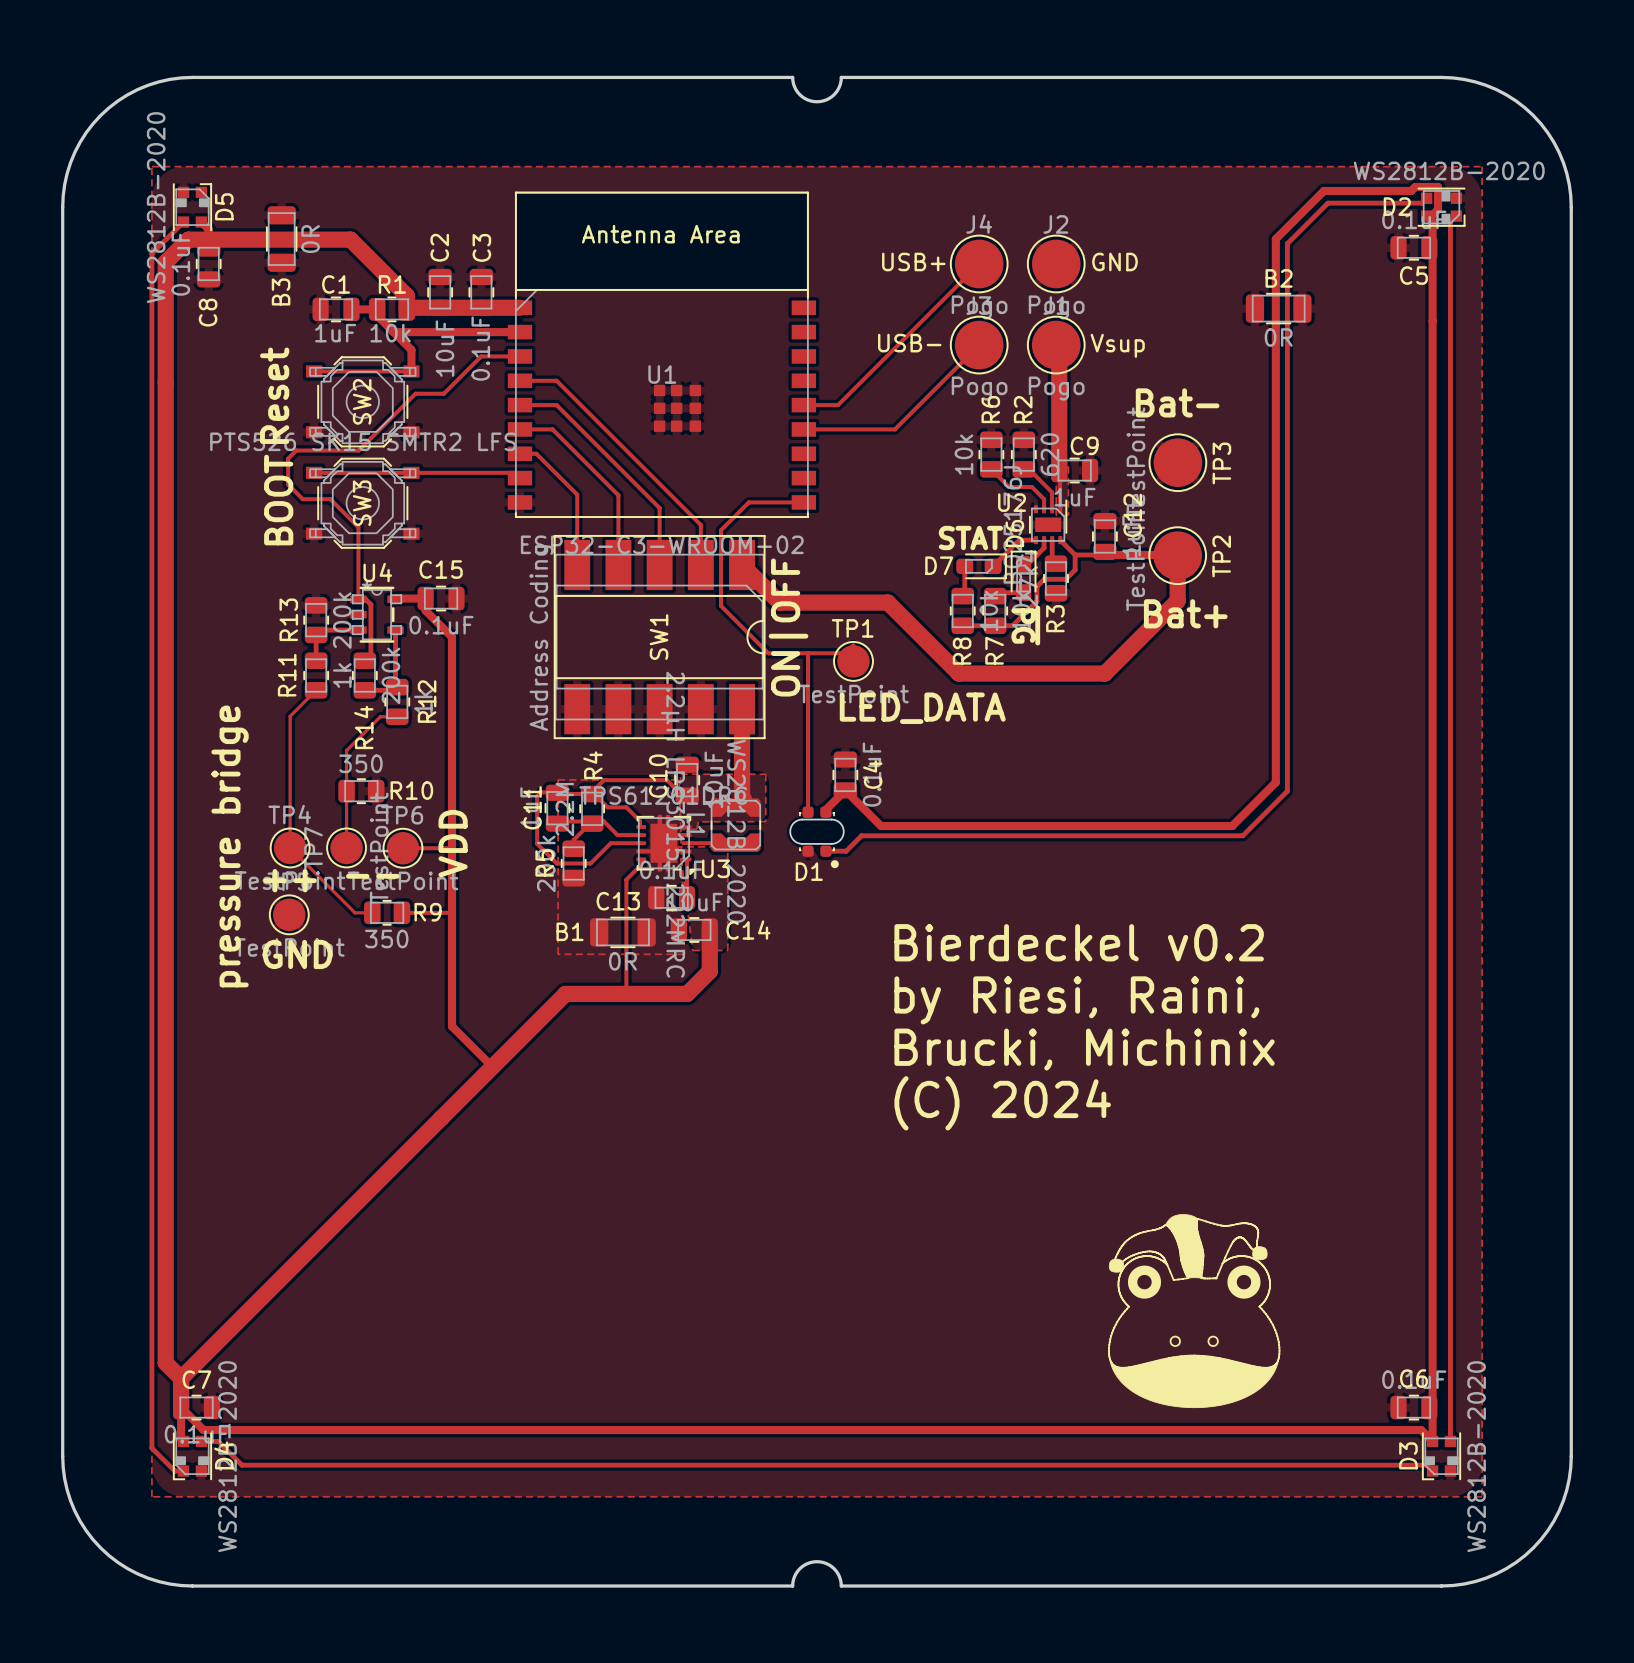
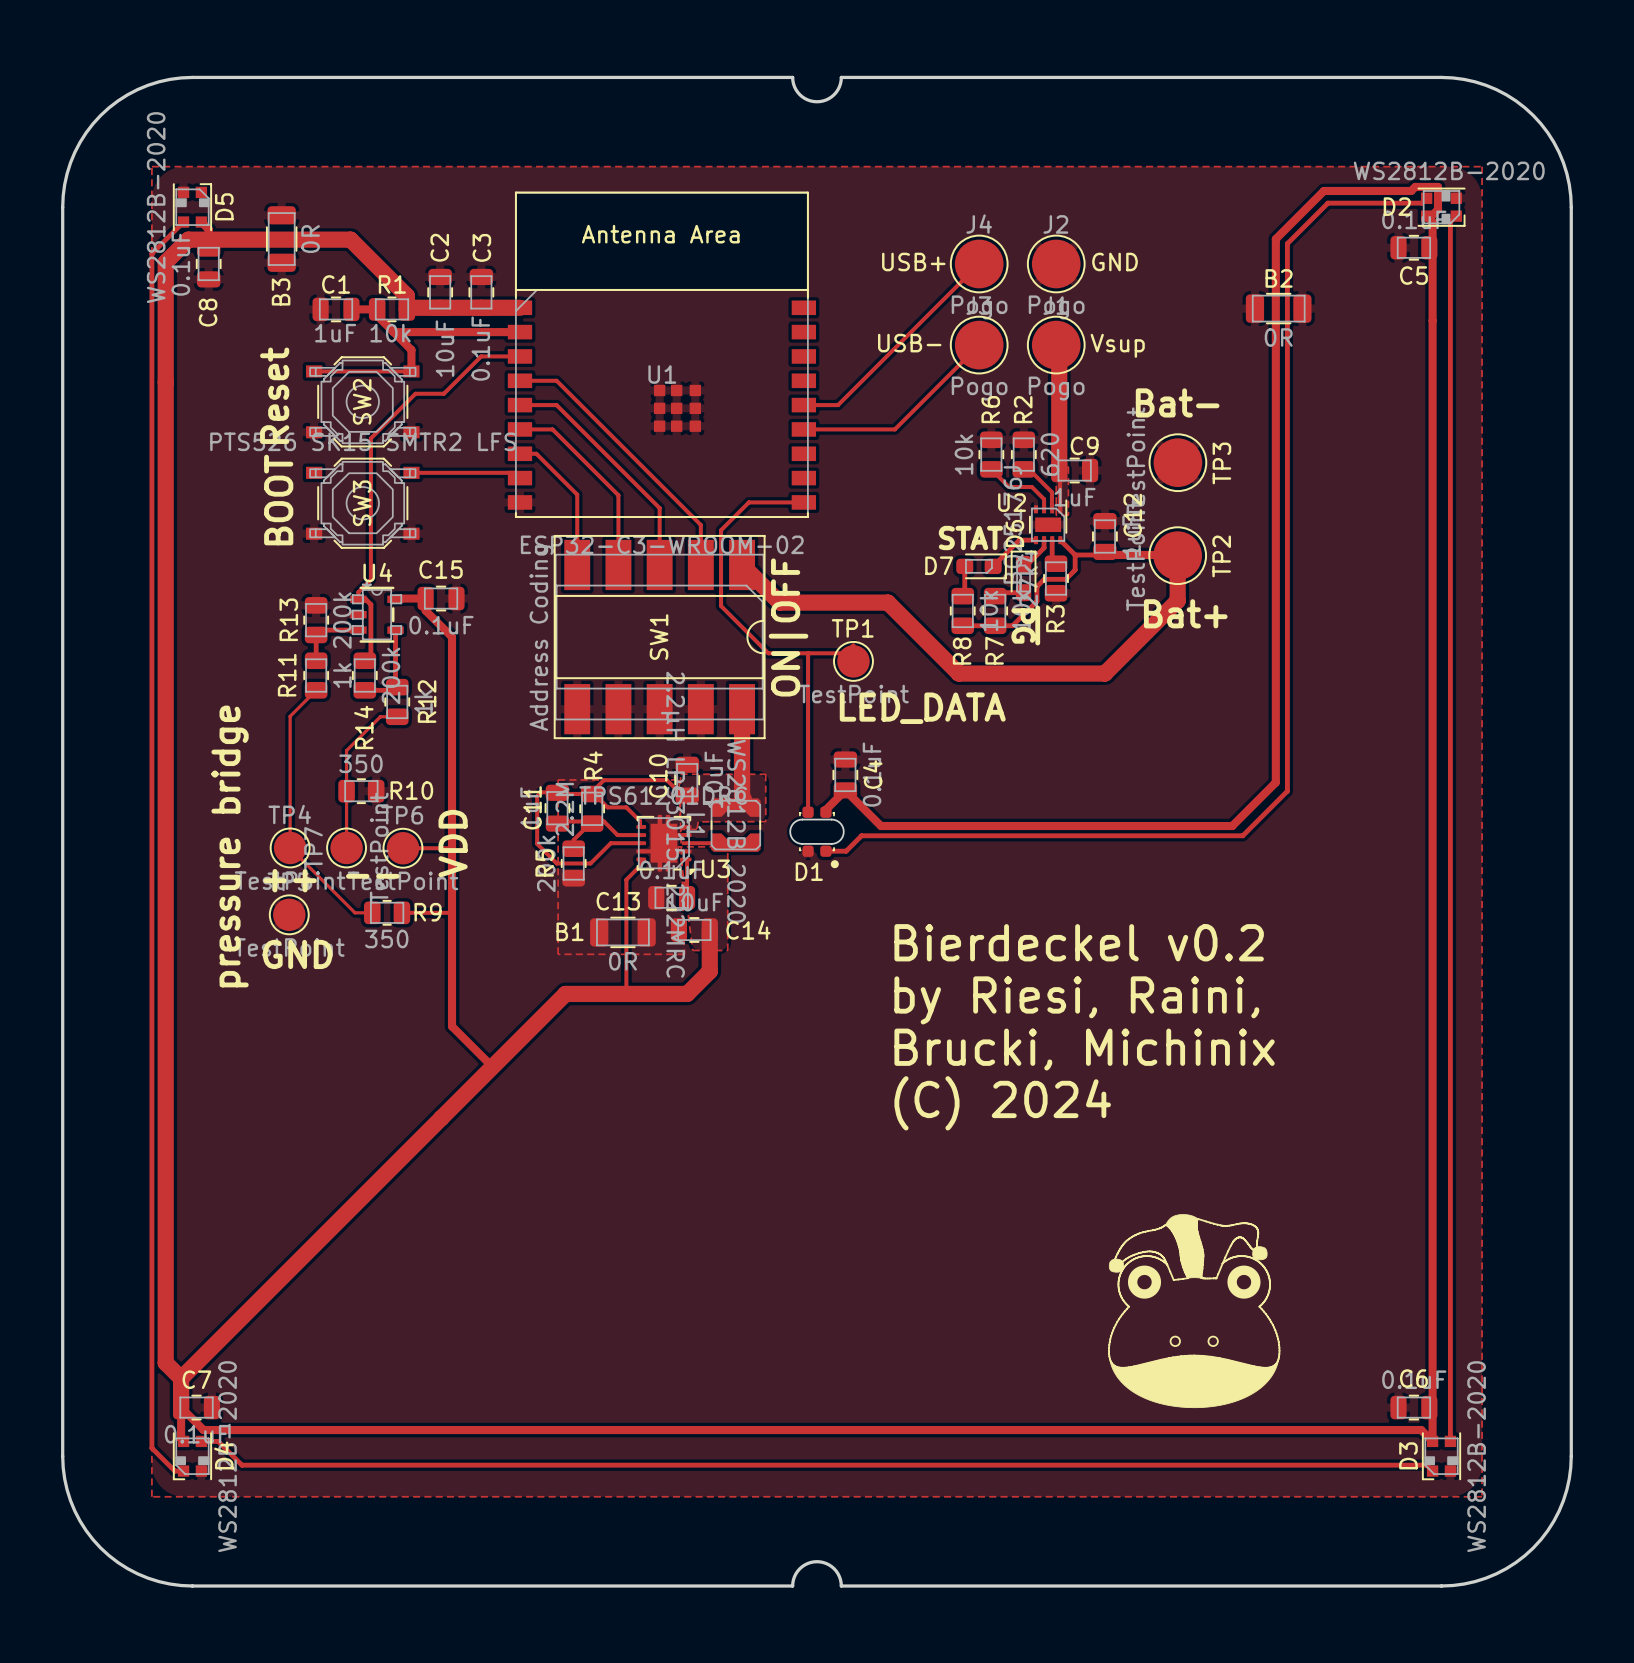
top track: (370, 438) (358, 450) (296, 450) (288, 458) (288, 484) (302, 499) (330, 499) (358, 527) (358, 592) -> (370, 438) (370, 579) (358, 592)
top track: (314, 472) (411, 472) -> none

